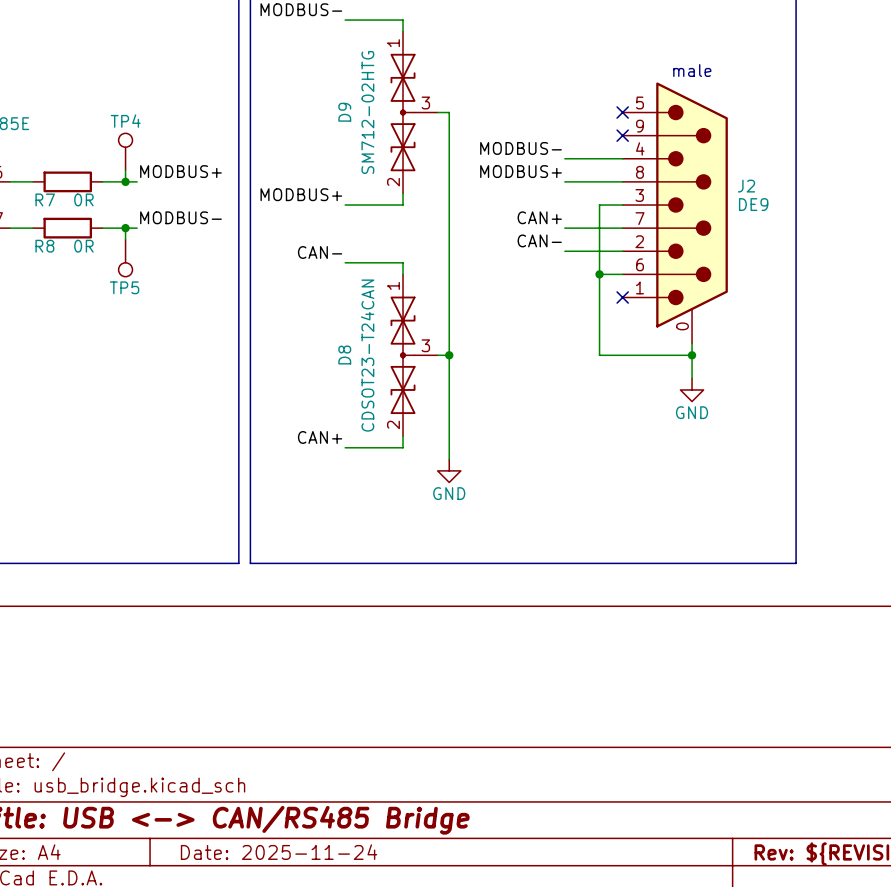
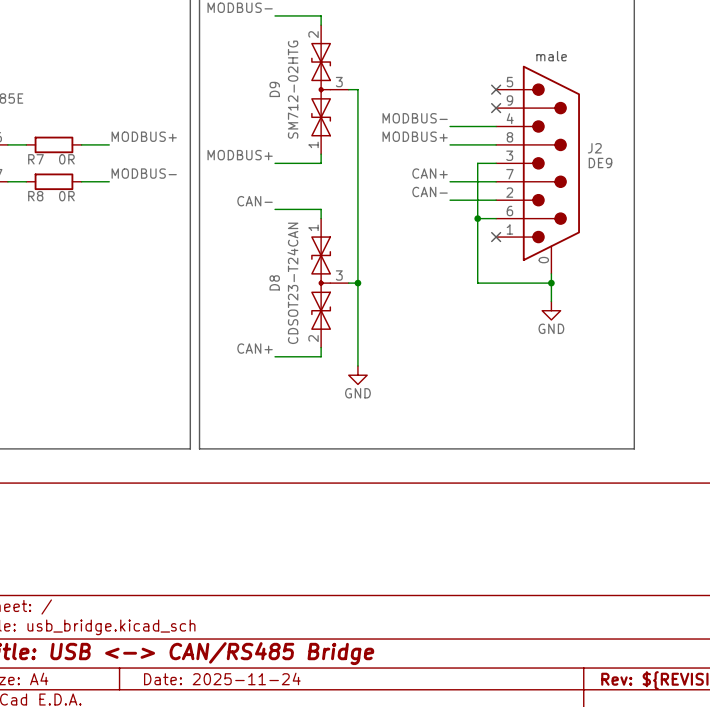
D9 flip: as is (403, 112) -> up-down (321, 89)
TP4: (125, 151) -> none
wire: (125, 170) (125, 181) -> none
junction: (125, 181) -> none
wire: (125, 228) (125, 239) -> none
junction: (125, 228) -> none
TP5: (125, 258) -> none

